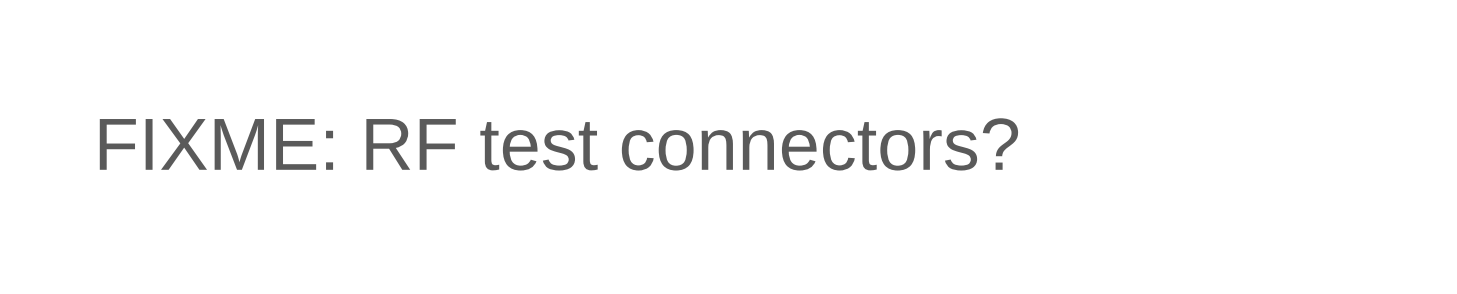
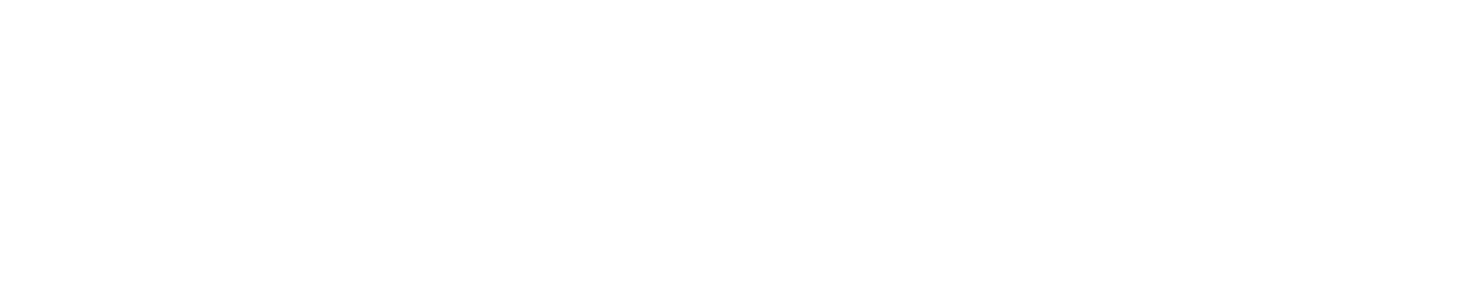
text: FIXME: RF test connectors? (558, 144) -> none

